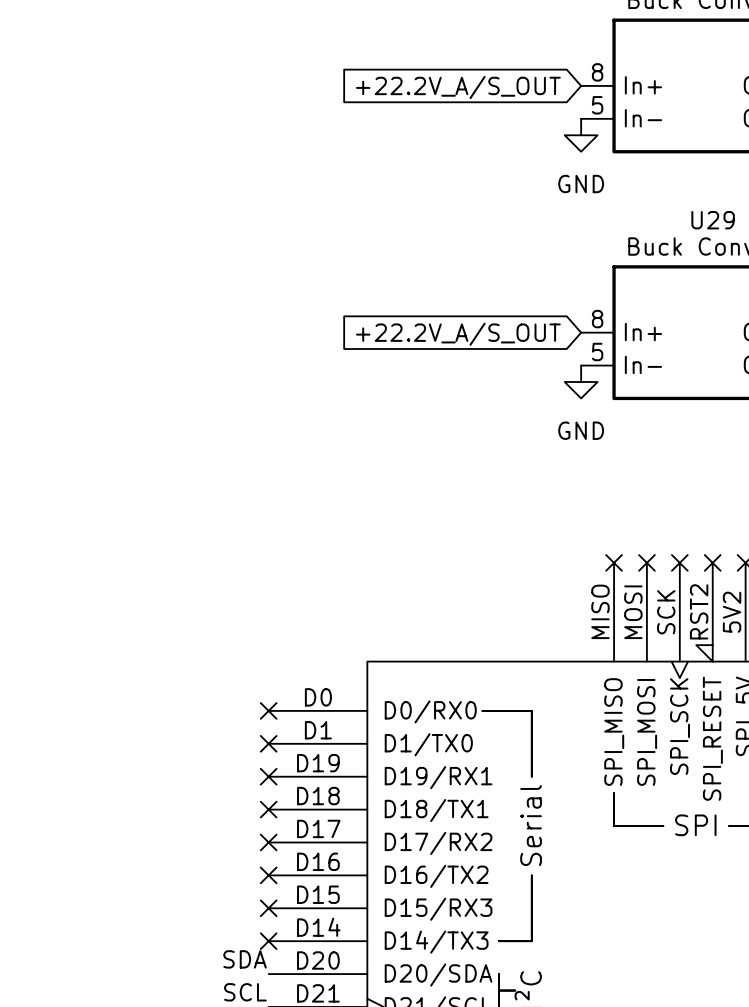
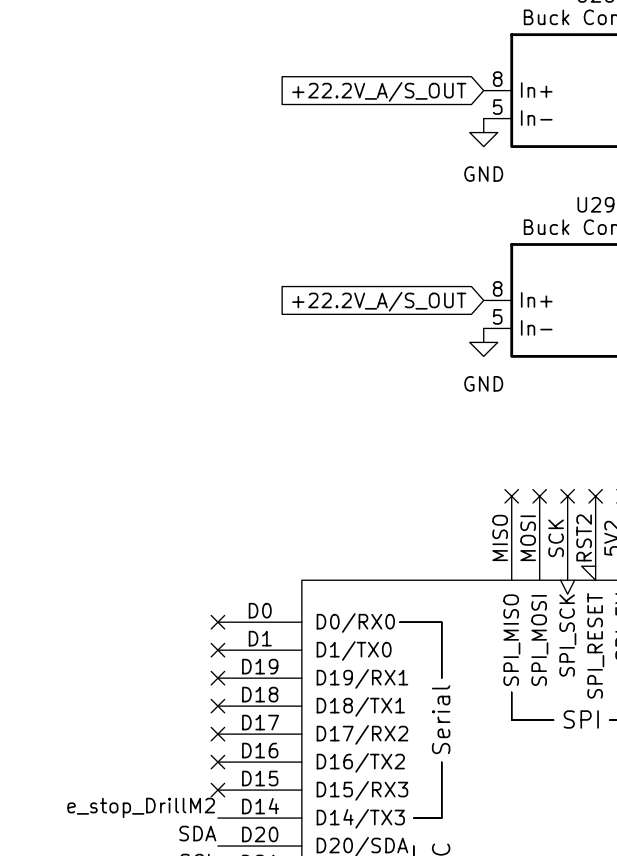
label: none -> e_stop_DrillM2 (141, 807)
no-connect mark: (268, 941) -> none

